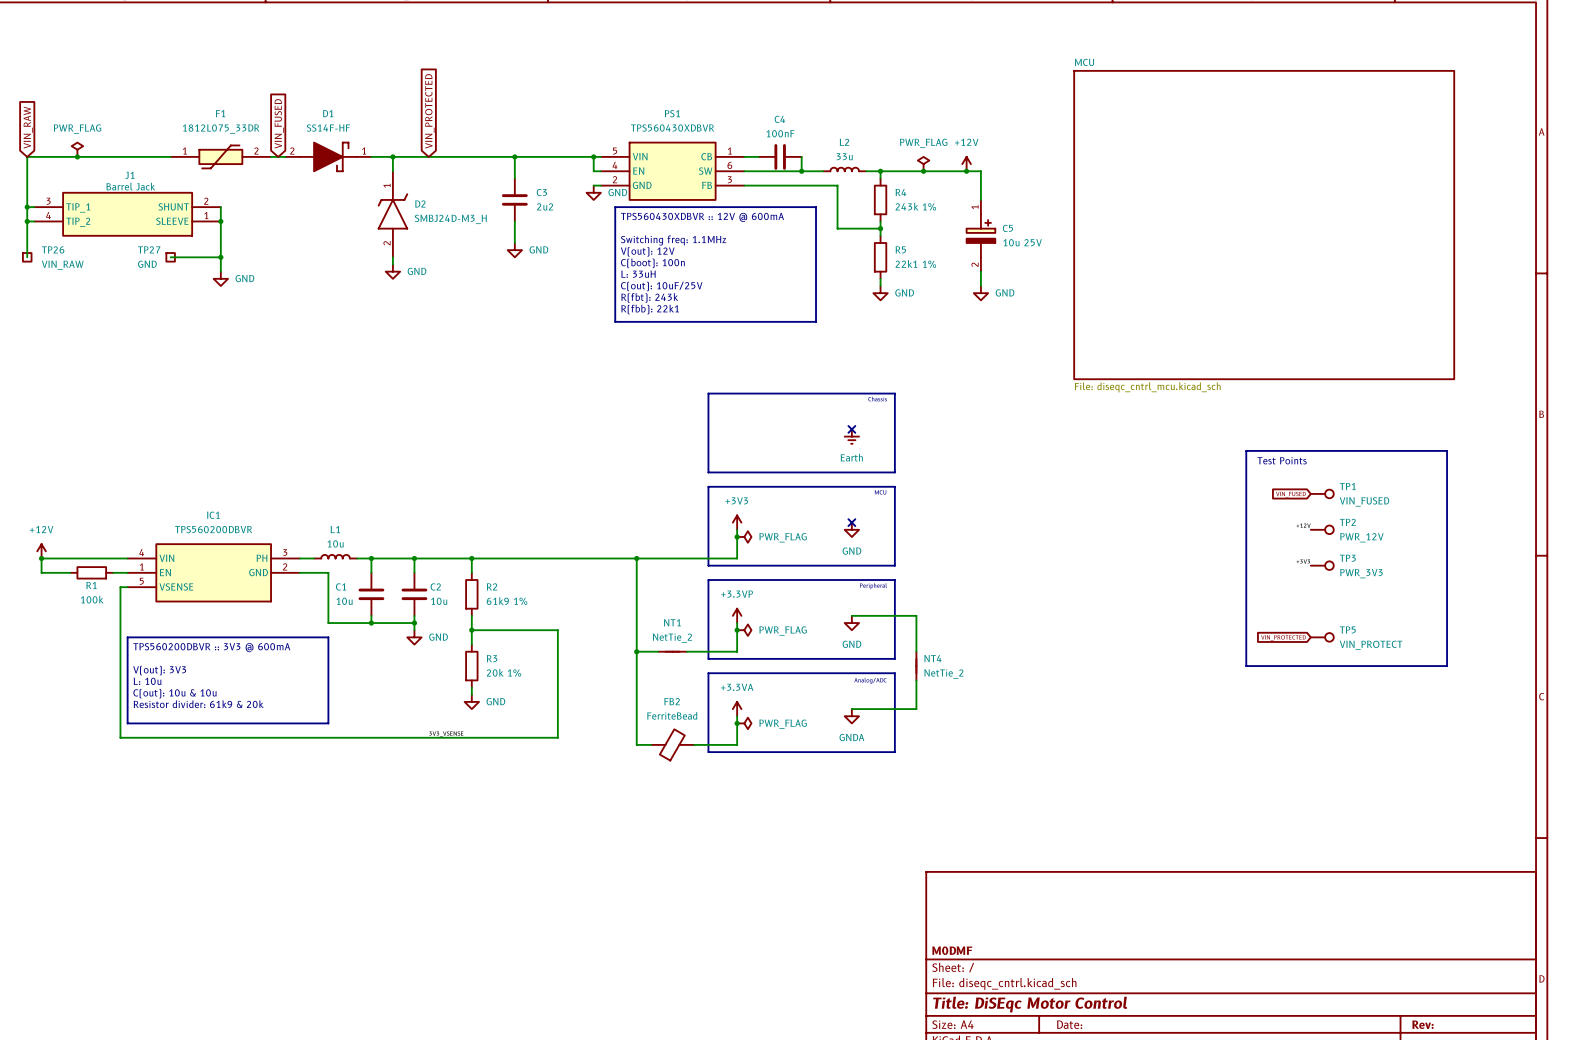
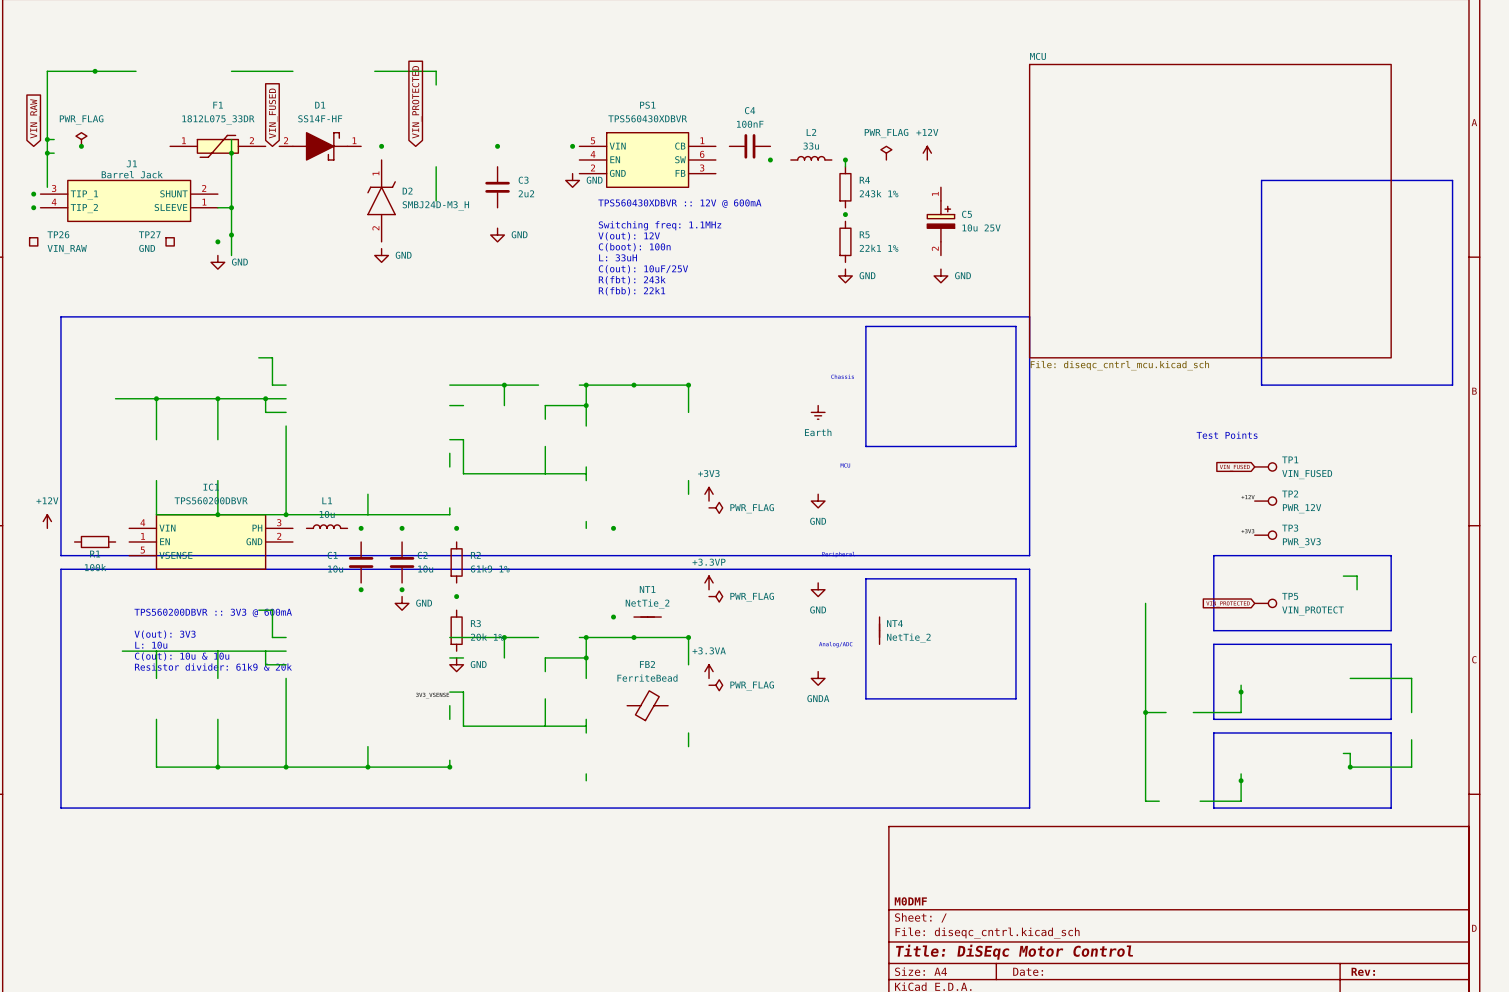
junction: none -> (95, 71)
wire: none -> (136, 71) (47, 71) (47, 187)
wire: none -> (231, 71) (292, 71)
wire: none -> (374, 71) (436, 71) (436, 84)
junction: none -> (47, 139)
wire: none -> (231, 139) (231, 255)
wire: (170, 156) (27, 156) (27, 257) -> none
wire: (271, 156) (285, 156) -> (217, 207) (231, 207)
wire: (371, 156) (600, 156) -> none
wire: (392, 156) (392, 171) -> none
wire: (514, 156) (514, 178) -> none
wire: (593, 156) (593, 171) (600, 171) -> none
wire: (744, 156) (758, 156) -> none
wire: (801, 156) (801, 171) -> none
junction: none -> (47, 153)
junction: none -> (231, 153)
wire: (744, 171) (823, 171) -> none
wire: (866, 171) (980, 171) (980, 199) -> none
junction: (923, 171) -> none
junction: (966, 171) -> none
wire: none -> (436, 166) (436, 200)
wire: (593, 185) (600, 185) -> none
wire: (744, 185) (837, 185) (837, 228) (880, 228) -> none
line: none -> (1261, 180) (1452, 180) (1452, 385) (1261, 385) (1261, 180)
wire: (27, 207) (34, 207) -> (47, 139) (54, 139)
wire: (220, 207) (220, 271) -> none
line: (615, 207) (816, 207) (816, 321) (615, 321) (615, 207) -> none
wire: (27, 221) (34, 221) -> (47, 153) (54, 153)
junction position: (220, 221) -> (231, 207)
wire: (514, 221) (514, 242) -> none
wire: (880, 221) (880, 235) -> none
junction: none -> (231, 235)
wire: (170, 257) (220, 257) -> none
wire: (392, 257) (392, 264) -> none
wire: (980, 271) (980, 286) -> none
wire: (880, 278) (880, 286) -> none
line: none -> (60, 316) (60, 555) (1029, 555) (1029, 316) (60, 316)
line: none -> (865, 326) (865, 446) (1015, 446) (1015, 326) (865, 326)
wire: none -> (258, 357) (272, 357) (272, 385) (286, 385)
line: (708, 393) (708, 472) (894, 472) (894, 393) (708, 393) -> none
wire: none -> (449, 385) (538, 385)
wire: none -> (504, 385) (504, 405)
junction: none -> (504, 385)
wire: none -> (579, 385) (688, 385) (688, 412)
wire: none -> (586, 385) (586, 426)
junction: none -> (586, 385)
junction: none -> (633, 385)
junction: none -> (688, 385)
wire: none -> (115, 398) (286, 398)
wire: none -> (156, 398) (156, 439)
junction: none -> (156, 398)
wire: none -> (217, 398) (217, 439)
junction: none -> (217, 398)
wire: none -> (265, 398) (265, 412) (286, 412)
junction: none -> (265, 398)
wire: none -> (449, 405) (463, 405)
wire: none -> (586, 405) (545, 405) (545, 419)
junction: none -> (586, 405)
no-connect mark: (851, 429) -> none
wire: none -> (286, 426) (286, 514)
wire: none -> (449, 439) (463, 439) (463, 473) (586, 473)
wire: none -> (545, 446) (545, 473)
line: (708, 486) (894, 486) (894, 565) (708, 565) (708, 486) -> none
wire: none -> (586, 466) (586, 480)
wire: none -> (156, 480) (156, 514) (449, 514) (449, 507)
wire: none -> (217, 480) (217, 514)
wire: none -> (688, 480) (688, 494)
wire: none -> (367, 494) (367, 514)
no-connect mark: (851, 522) -> none
wire: (737, 529) (737, 558) (357, 558) -> none
junction: (737, 536) -> none
junction: none -> (217, 514)
junction: none -> (286, 514)
wire: none -> (586, 521) (586, 528)
junction: (41, 558) -> none
wire: (127, 558) (41, 558) (41, 572) (70, 572) -> none
wire: (299, 558) (314, 558) -> none
wire: (371, 558) (371, 572) -> none
wire: (414, 558) (414, 572) -> none
wire: (471, 558) (471, 572) -> (449, 453) (449, 466)
wire: (636, 558) (636, 744) (651, 744) -> none
wire: (113, 572) (127, 572) -> none
wire: (299, 572) (328, 572) (328, 623) (414, 623) -> none
line: (708, 580) (708, 658) (894, 658) (894, 580) (708, 580) -> none
wire: (127, 587) (120, 587) (120, 737) (557, 737) (557, 630) (471, 630) -> none
line: none -> (60, 569) (1029, 569) (1029, 808) (60, 808) (60, 569)
wire: none -> (1343, 576) (1357, 576) (1357, 589)
line: none -> (865, 578) (1015, 578) (1015, 698) (865, 698) (865, 578)
wire: (371, 615) (371, 623) -> none
wire: (414, 615) (414, 630) -> (449, 705) (449, 719)
wire: (471, 615) (471, 644) -> none
wire: (851, 615) (916, 615) (916, 651) -> none
wire: (737, 623) (737, 651) (686, 651) -> none
junction: (737, 630) -> none
line: (127, 637) (328, 637) (328, 723) (127, 723) (127, 637) -> none
wire: none -> (1145, 603) (1145, 801) (1159, 801)
wire: none -> (258, 610) (272, 610) (272, 637) (286, 637)
wire: (636, 651) (658, 651) -> none
line: (1267, 666) (1246, 666) (1246, 450) (1447, 450) (1447, 666) -> (1213, 630) (1213, 555) (1391, 555) (1391, 630) (1384, 630)
wire: none -> (449, 637) (538, 637)
wire: none -> (504, 637) (504, 657)
junction: none -> (504, 637)
wire: none -> (579, 637) (688, 637) (688, 664)
wire: none -> (586, 637) (586, 678)
junction: none -> (586, 637)
junction: none -> (633, 637)
line: (708, 673) (708, 752) (894, 752) (894, 673) (708, 673) -> none
junction: none -> (688, 637)
wire: (916, 680) (916, 709) (851, 709) -> none
line: none -> (1213, 644) (1391, 644) (1391, 719) (1213, 719) (1213, 644)
wire: none -> (122, 651) (286, 651)
wire: none -> (156, 651) (156, 678)
wire: none -> (217, 651) (217, 678)
wire: none -> (265, 651) (265, 664) (286, 664)
wire: (471, 687) (471, 694) -> none
wire: none -> (449, 657) (463, 657)
wire: none -> (586, 657) (545, 657) (545, 671)
junction: none -> (586, 657)
wire: none -> (286, 678) (286, 767)
wire: (737, 716) (737, 744) (694, 744) -> none
wire: none -> (1350, 678) (1411, 678) (1411, 712)
junction: (737, 723) -> none
wire: none -> (1241, 685) (1241, 712) (1193, 712)
wire: none -> (449, 692) (463, 692) (463, 726) (586, 726)
junction: none -> (1241, 692)
wire: none -> (545, 698) (545, 726)
wire: none -> (1145, 712) (1166, 712)
junction: none -> (1145, 712)
wire: none -> (156, 719) (156, 767) (449, 767) (449, 760)
wire: none -> (217, 719) (217, 767)
wire: none -> (586, 719) (586, 732)
wire: none -> (688, 732) (688, 746)
line: none -> (1213, 732) (1213, 808) (1391, 808) (1391, 732) (1213, 732)
wire: none -> (1411, 739) (1411, 767) (1350, 767) (1350, 753) (1343, 753)
wire: none -> (367, 746) (367, 767)
junction: none -> (217, 767)
junction: none -> (286, 767)
junction: none -> (367, 767)
junction: none -> (449, 767)
junction: none -> (1350, 767)
wire: none -> (586, 773) (586, 780)
wire: none -> (1241, 773) (1241, 801) (1200, 801)
junction: none -> (1241, 780)

